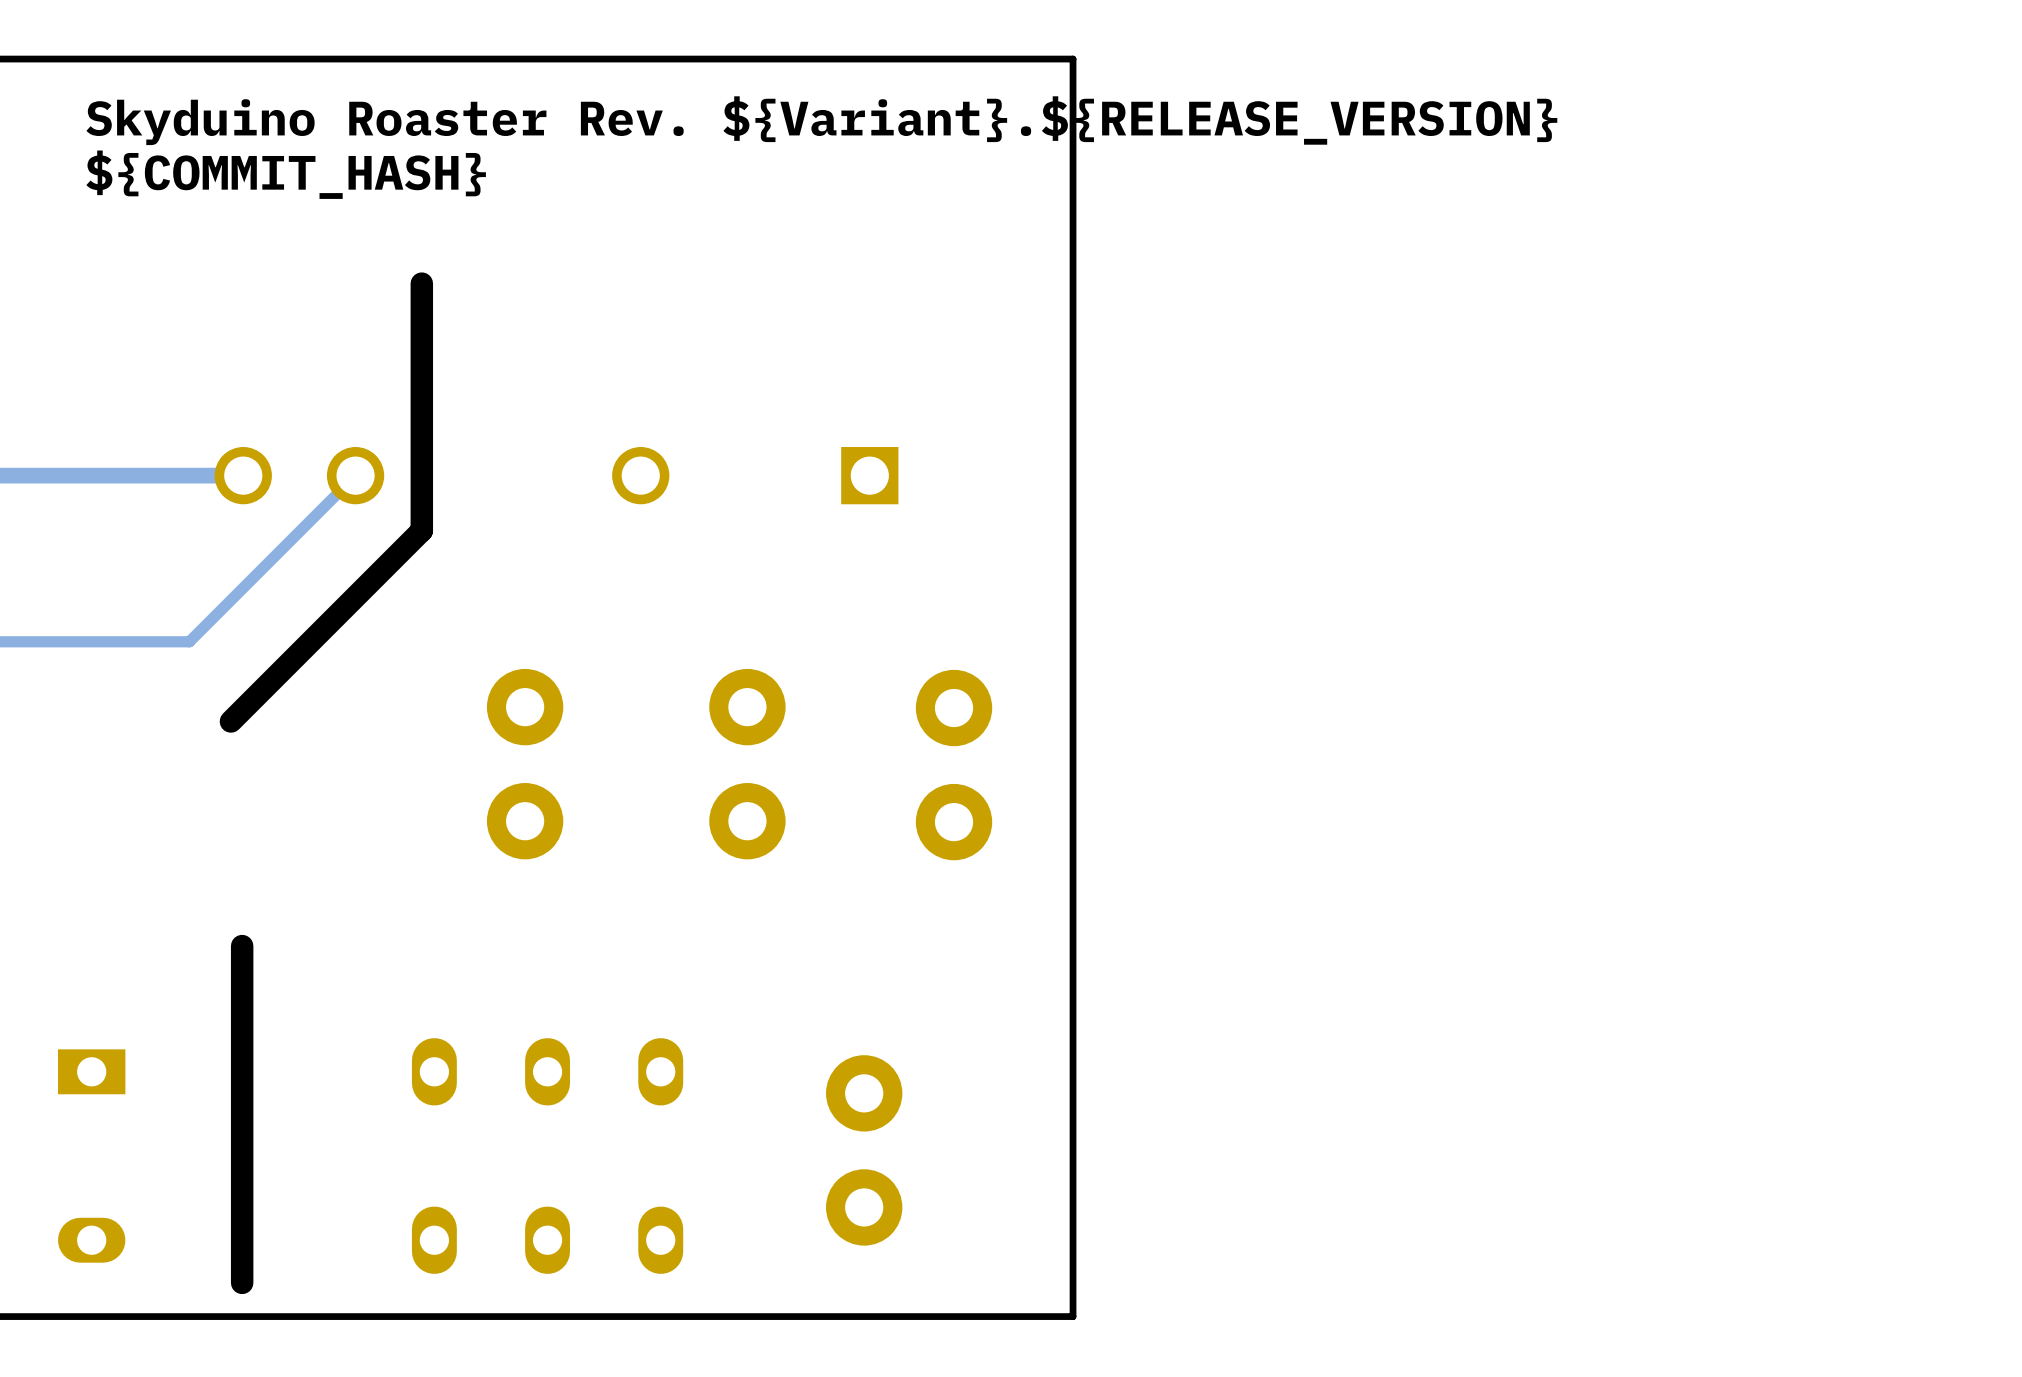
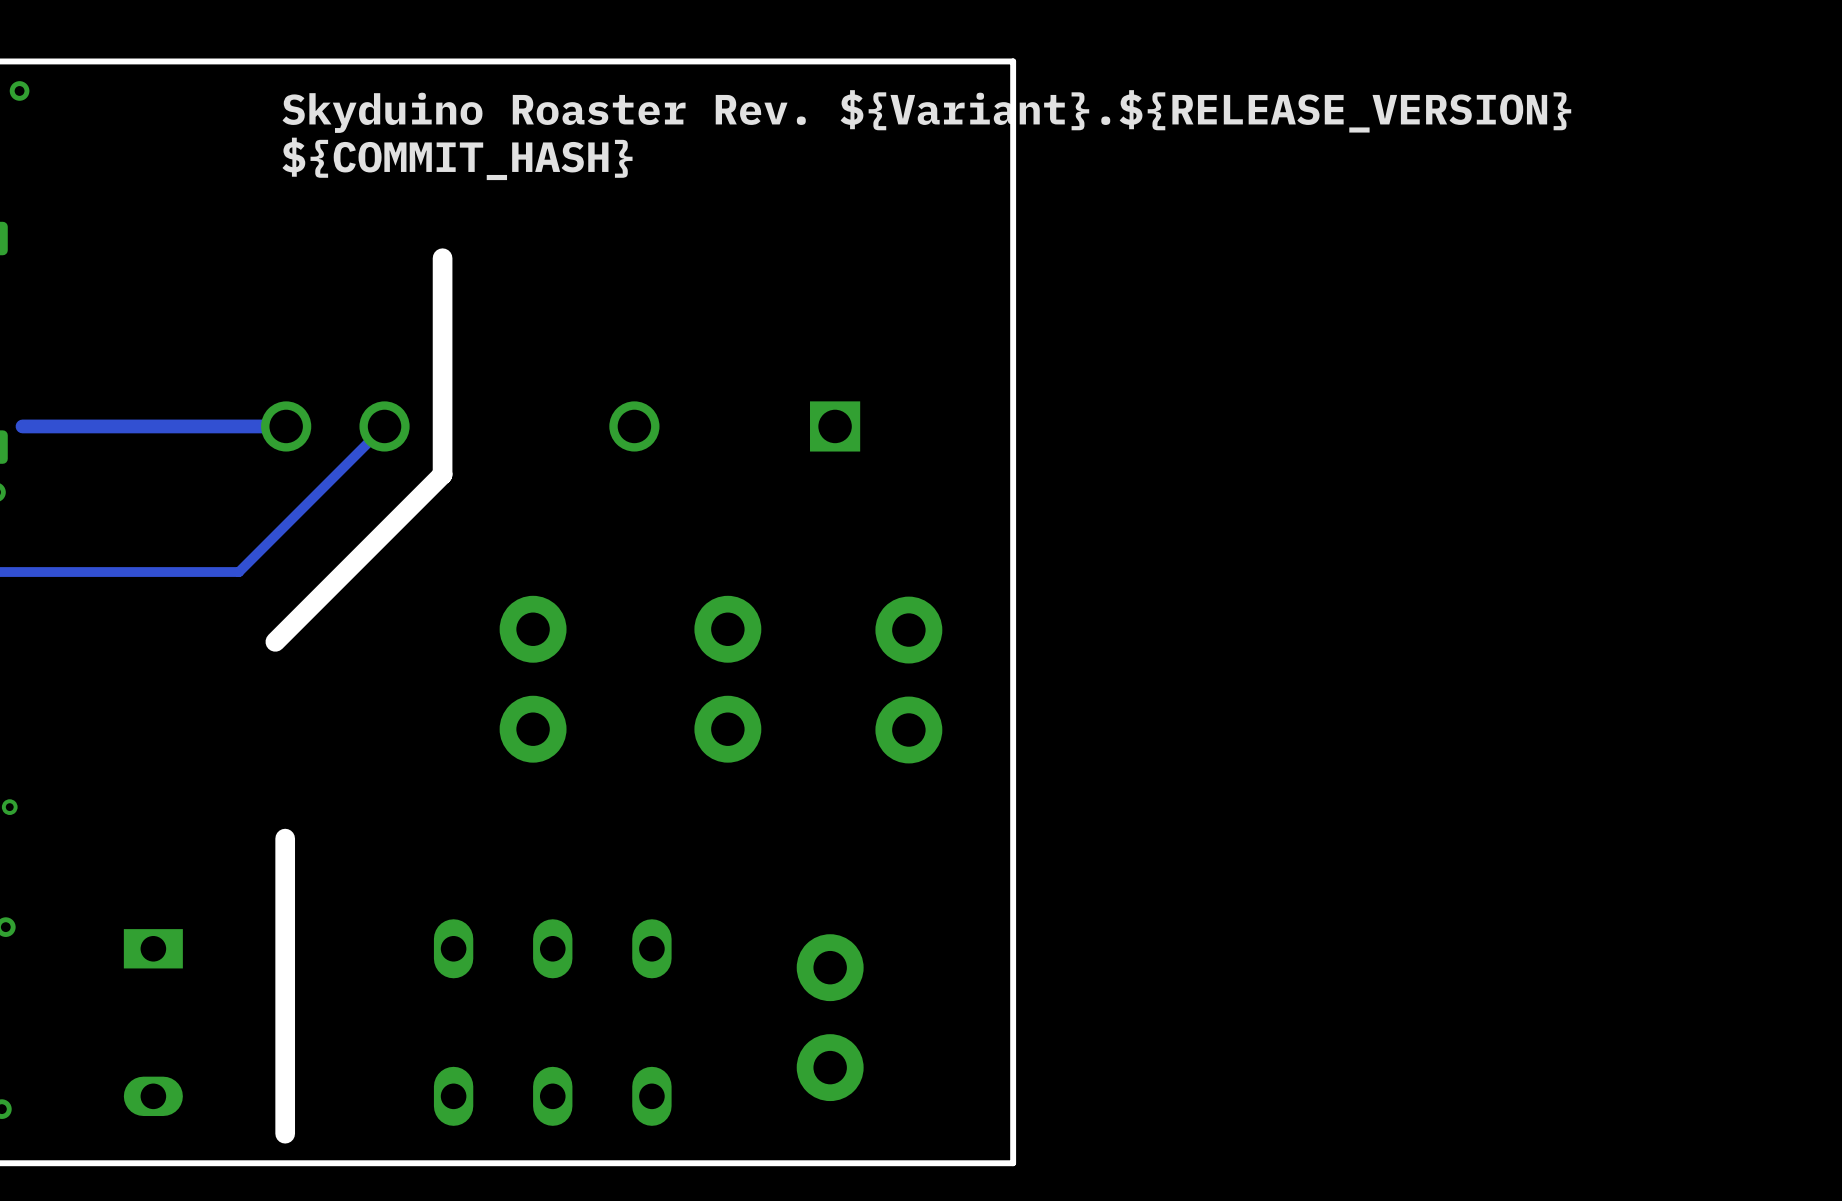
text position: Skyduino Roaster Rev. ${Variant}.${RELEASE_VERSION} (821, 120) -> Skyduino Roaster Rev. ${Variant}.${RELEASE_VERSION} (926, 111)
text position: ${COMMIT_HASH} (286, 174) -> ${COMMIT_HASH} (457, 158)

